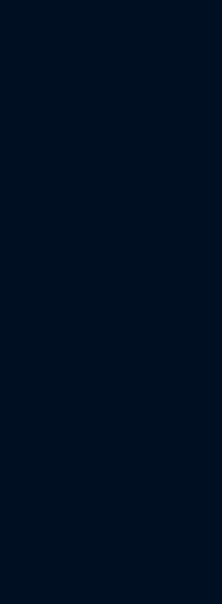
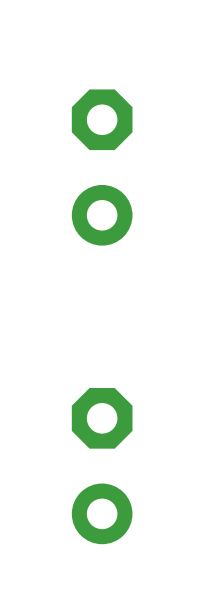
part: none -> (102, 167)
part: none -> (102, 466)

